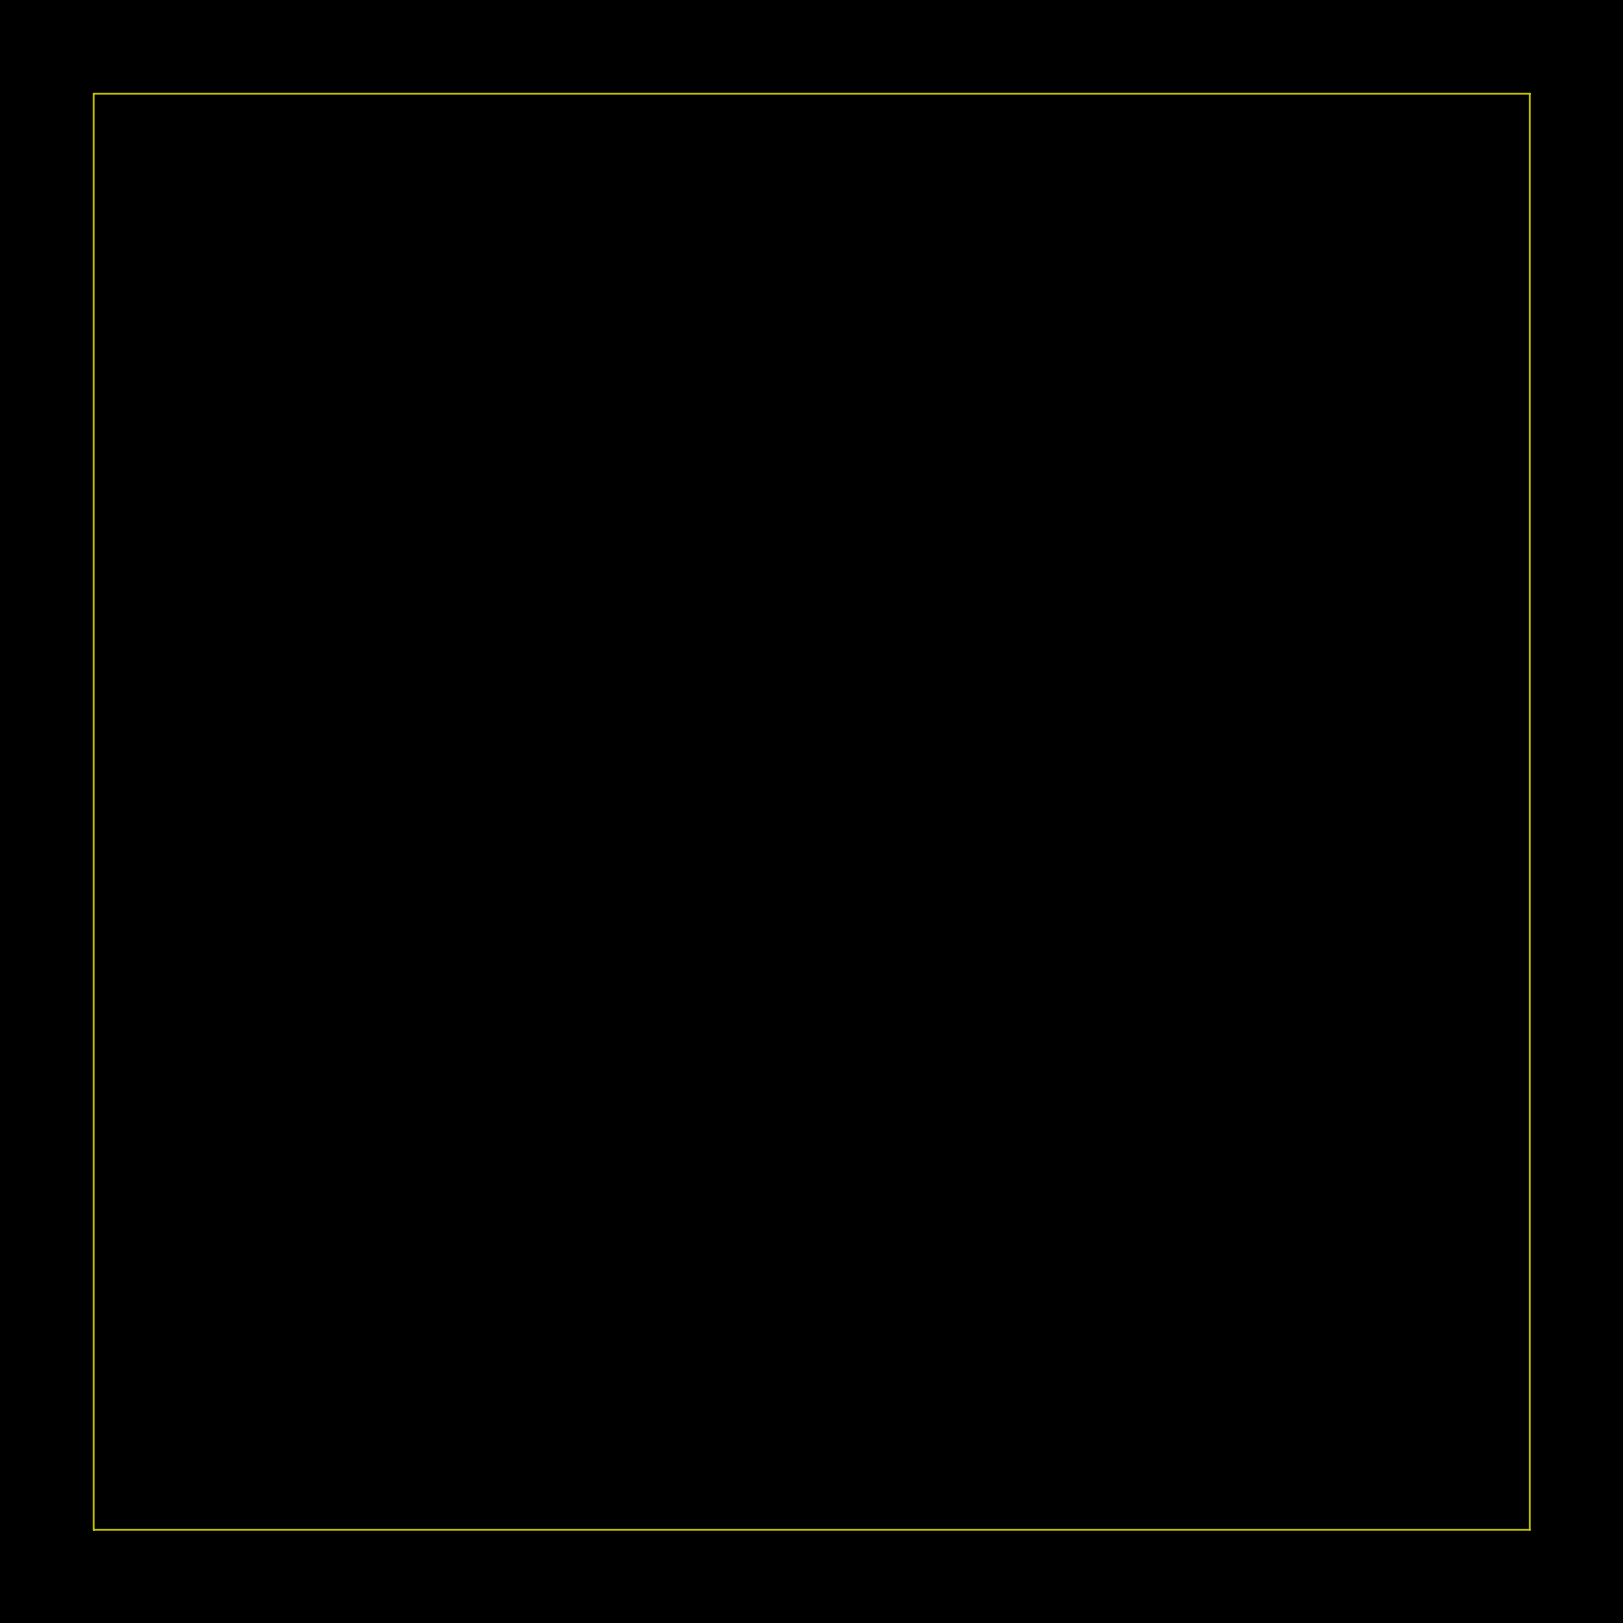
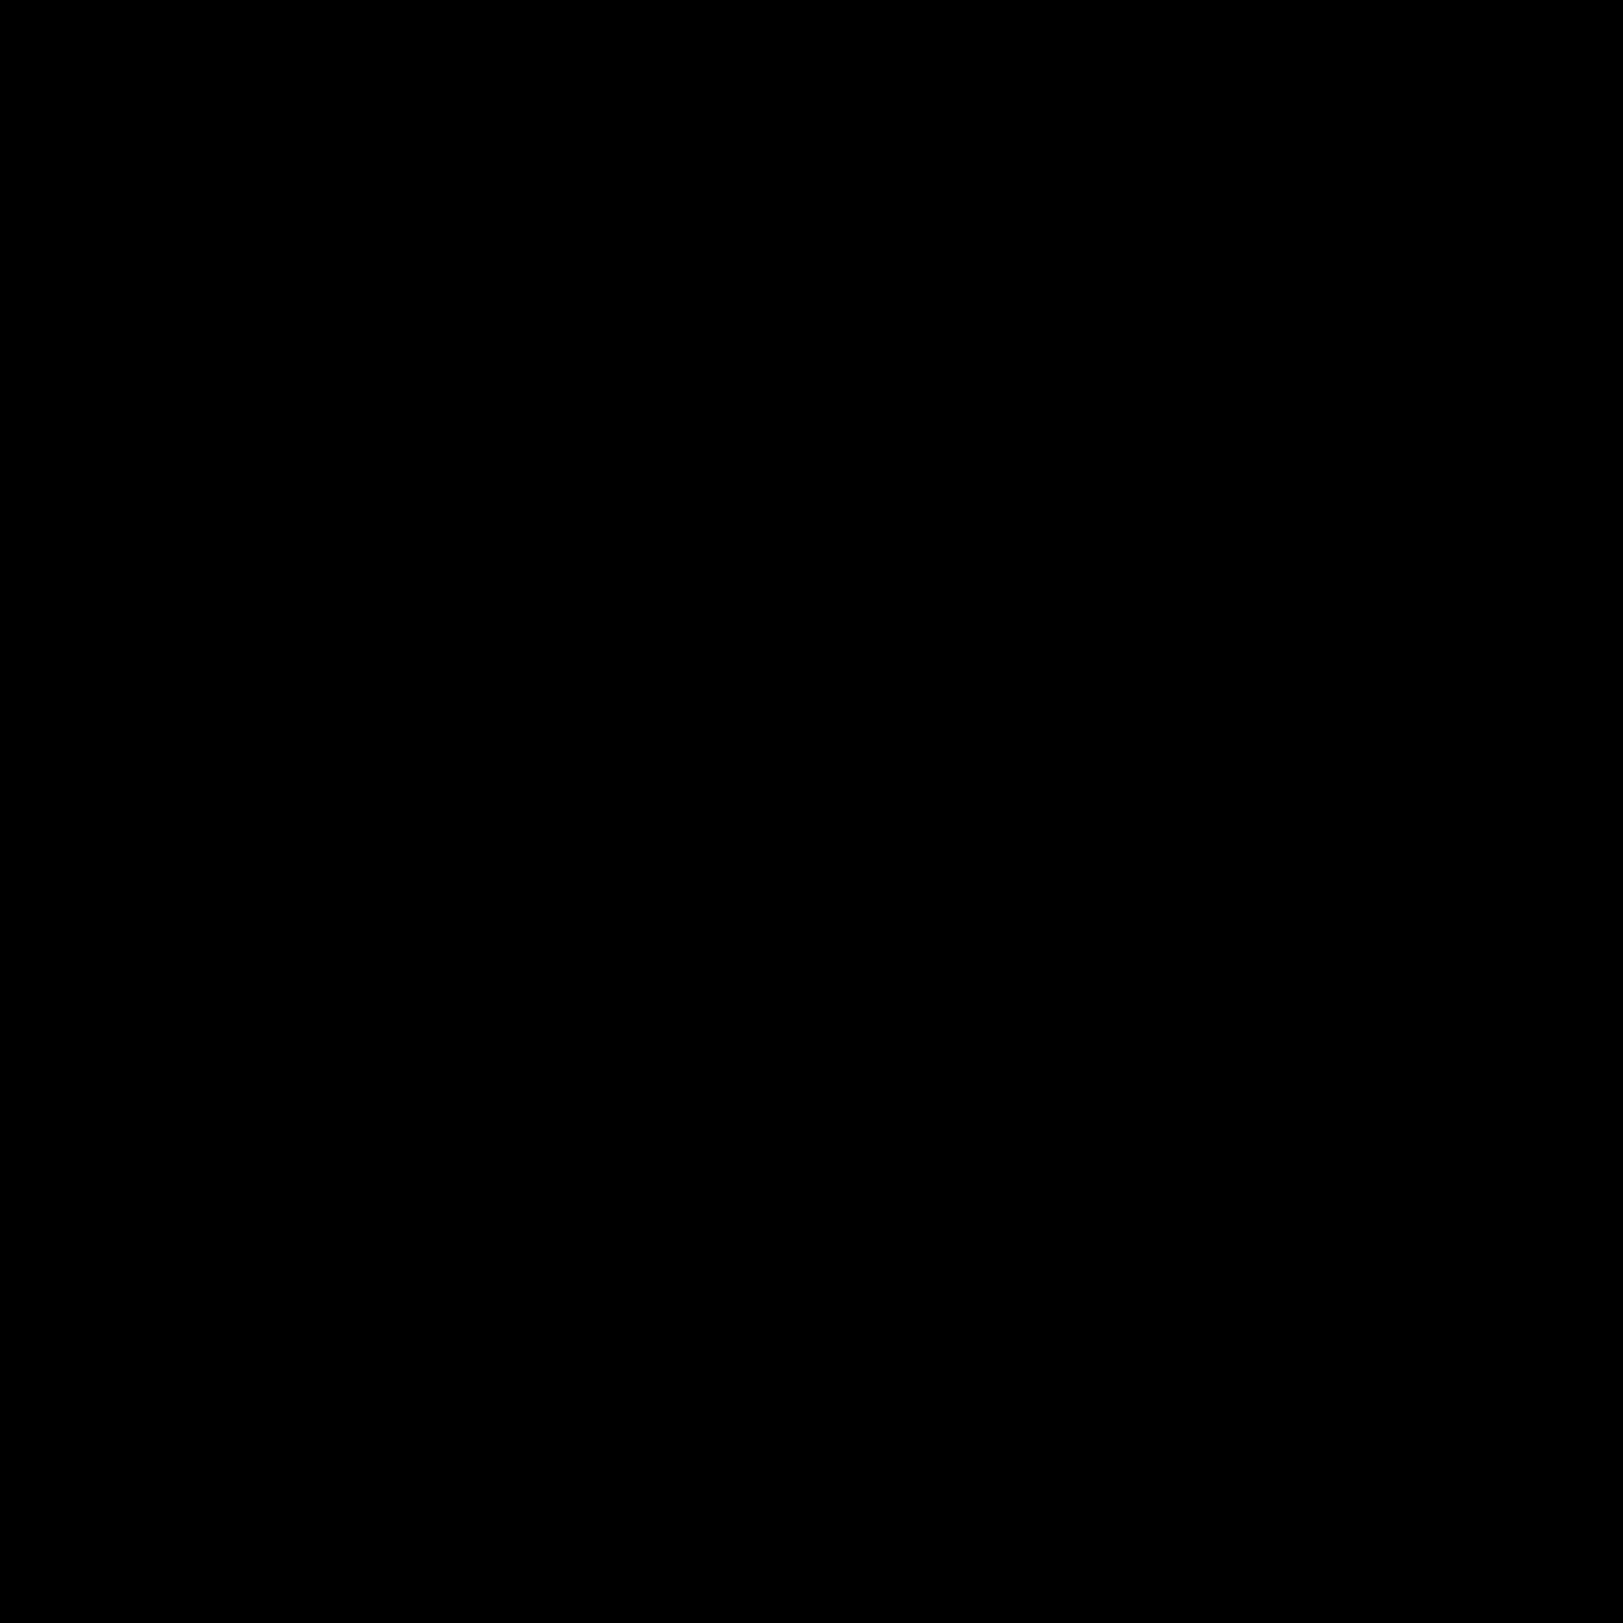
board edge: (1529, 93) (93, 93) (93, 1529) (1529, 1529) (1529, 93) -> none

